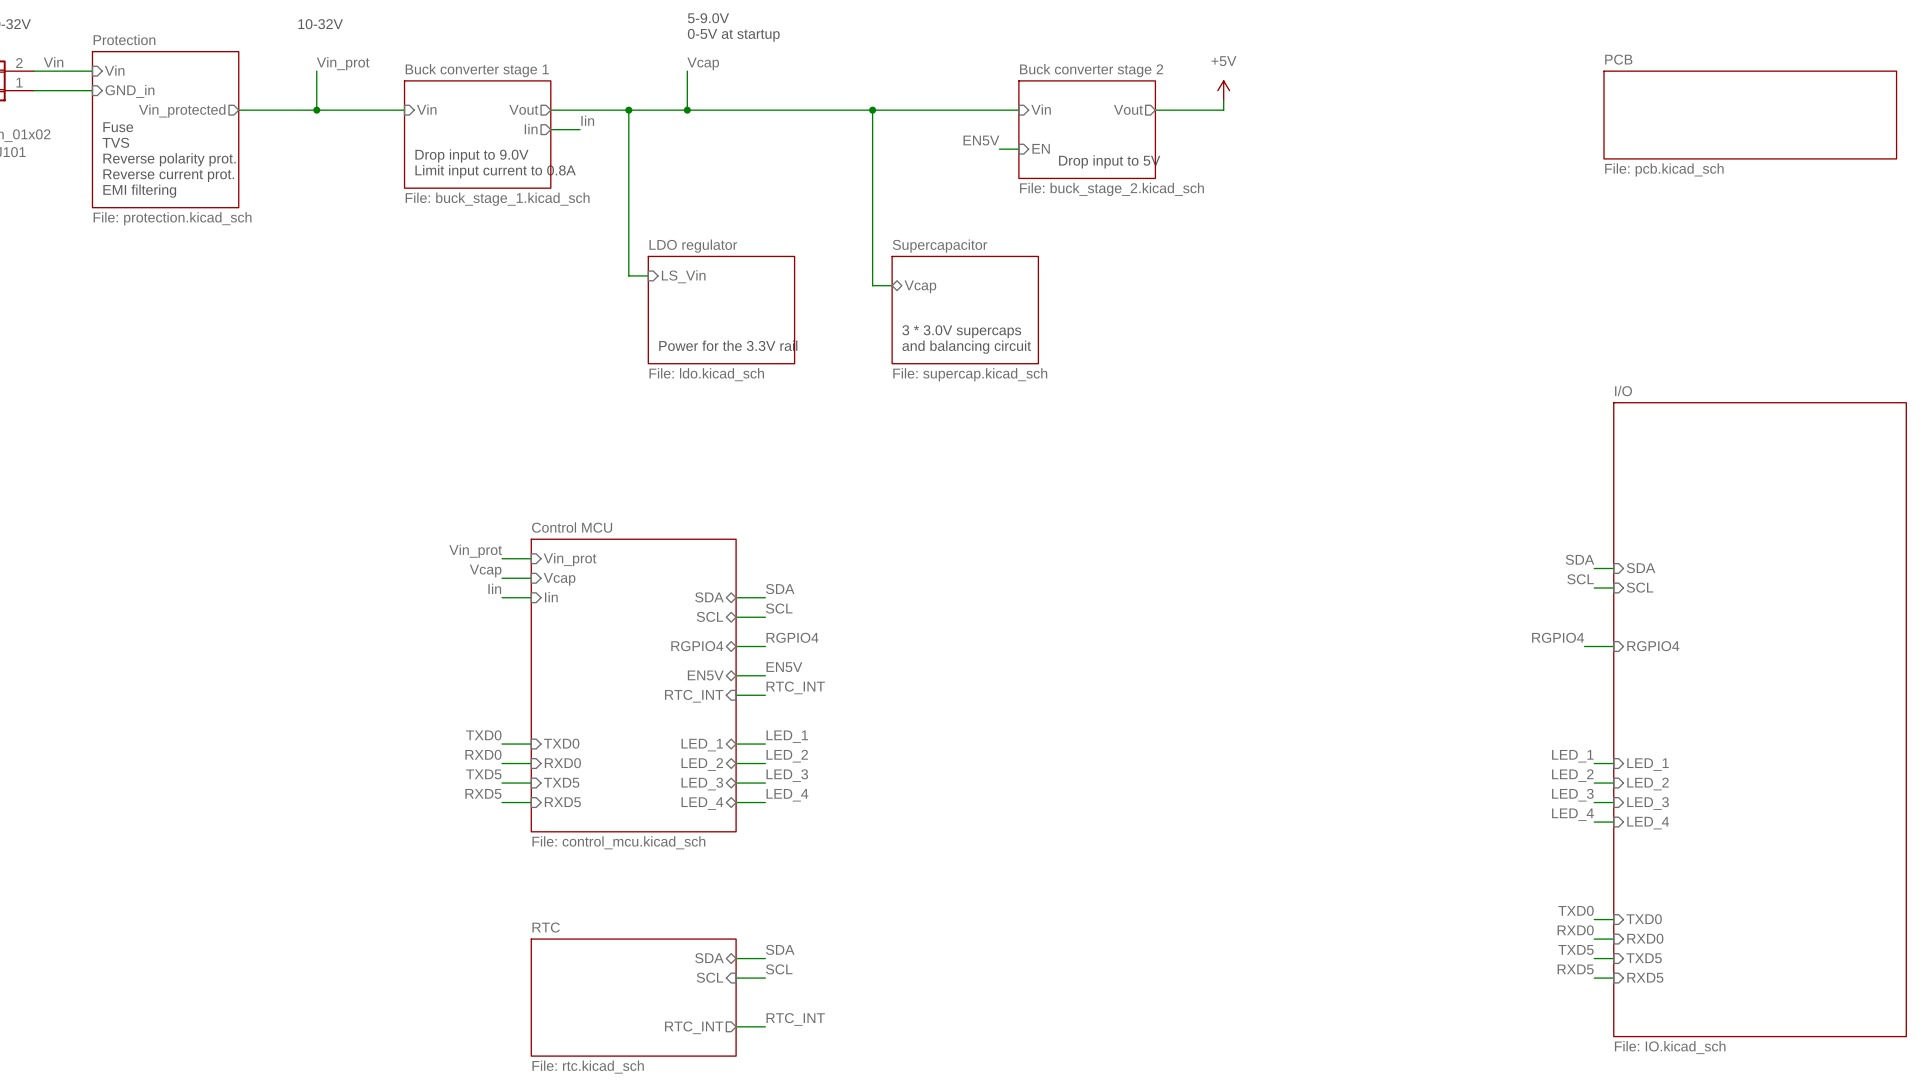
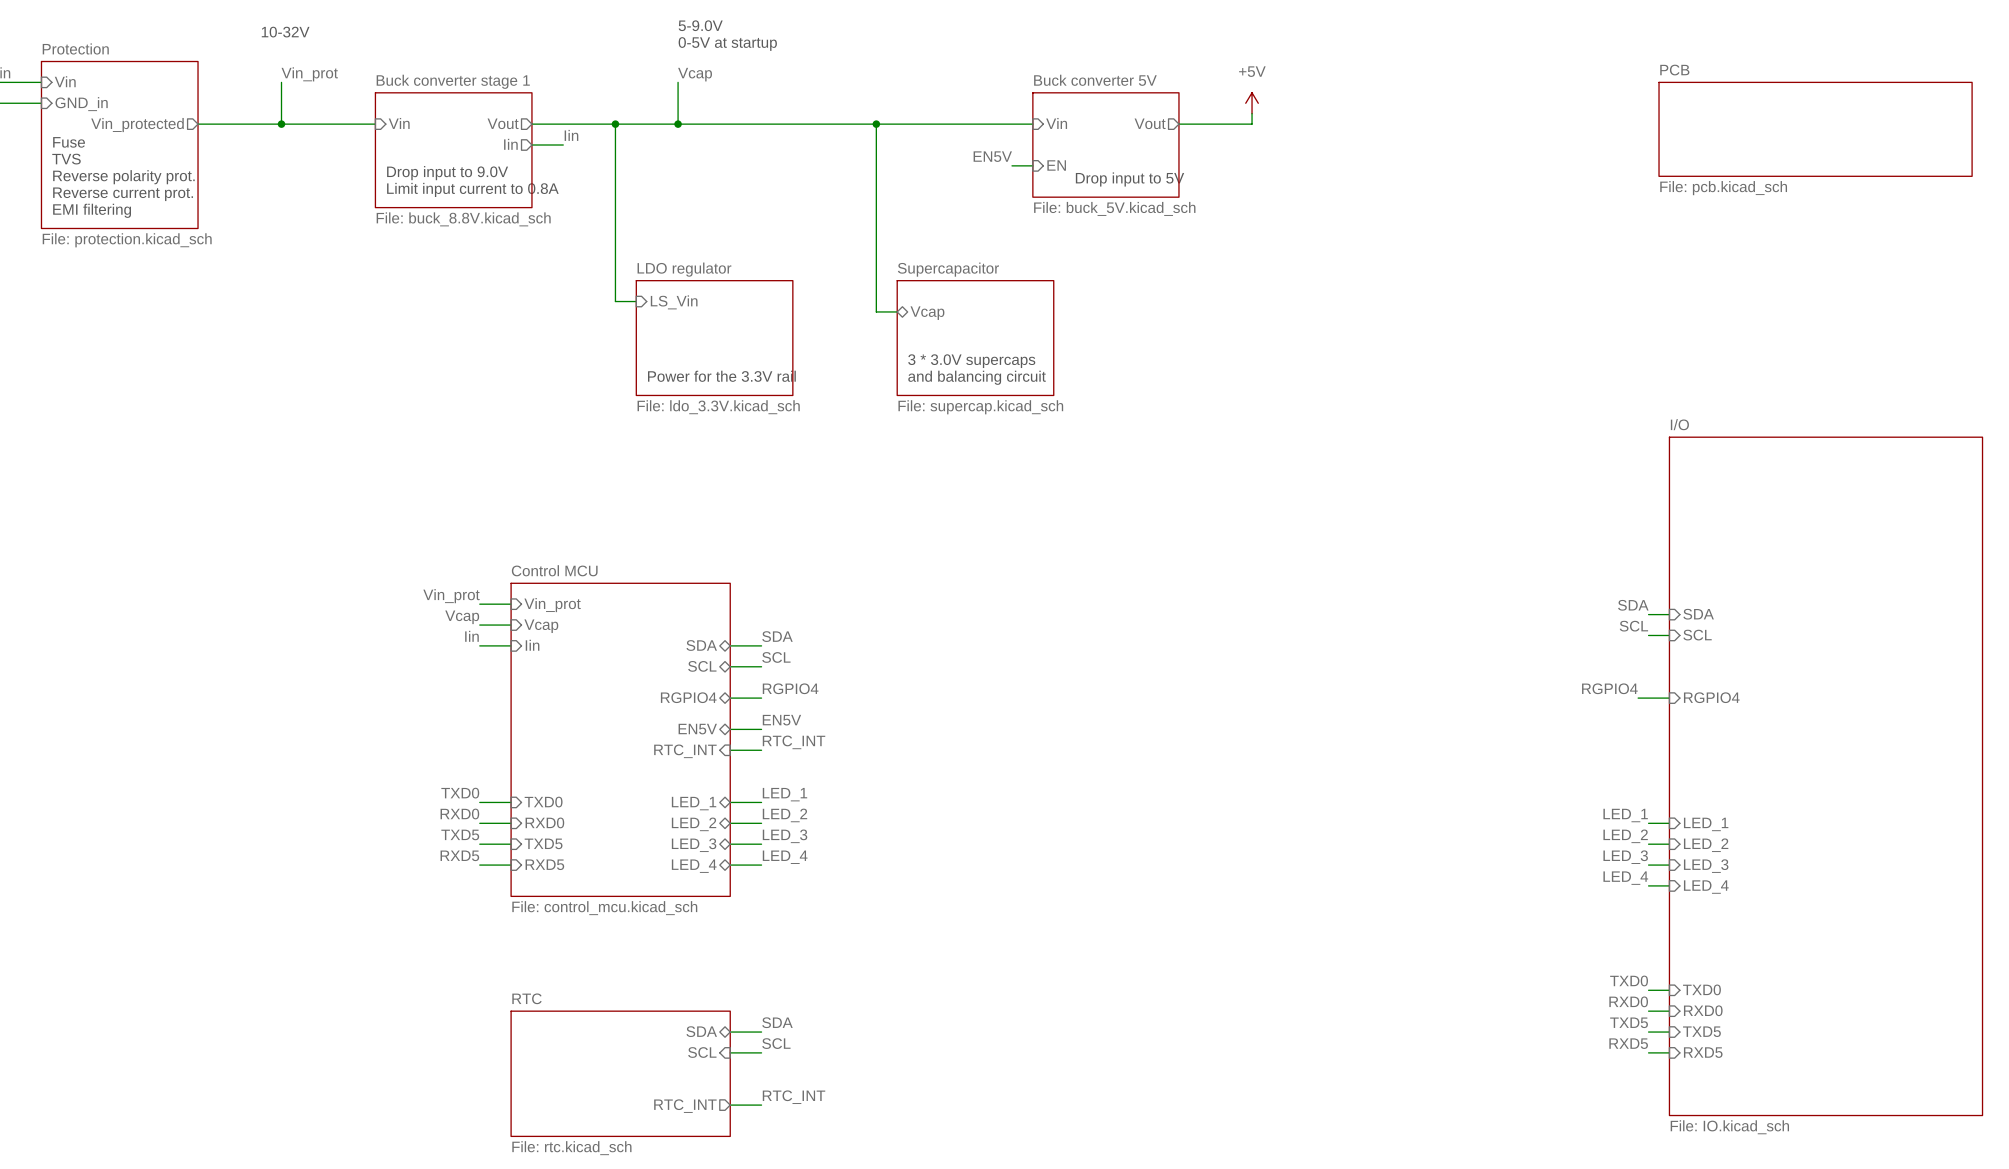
sheet Buck converter stage 2 name: Buck converter stage 2 (1091, 70) -> Buck converter 5V (1095, 80)
sheet Buck converter stage 2 value: File: buck_stage_2.kicad_sch (1111, 189) -> File: buck_5V.kicad_sch (1114, 208)
sheet Buck converter stage 1 value: File: buck_stage_1.kicad_sch (497, 199) -> File: buck_8.8V.kicad_sch (463, 219)
sheet LDO regulator value: File: ldo.kicad_sch (706, 374) -> File: ldo_3.3V.kicad_sch (718, 407)

